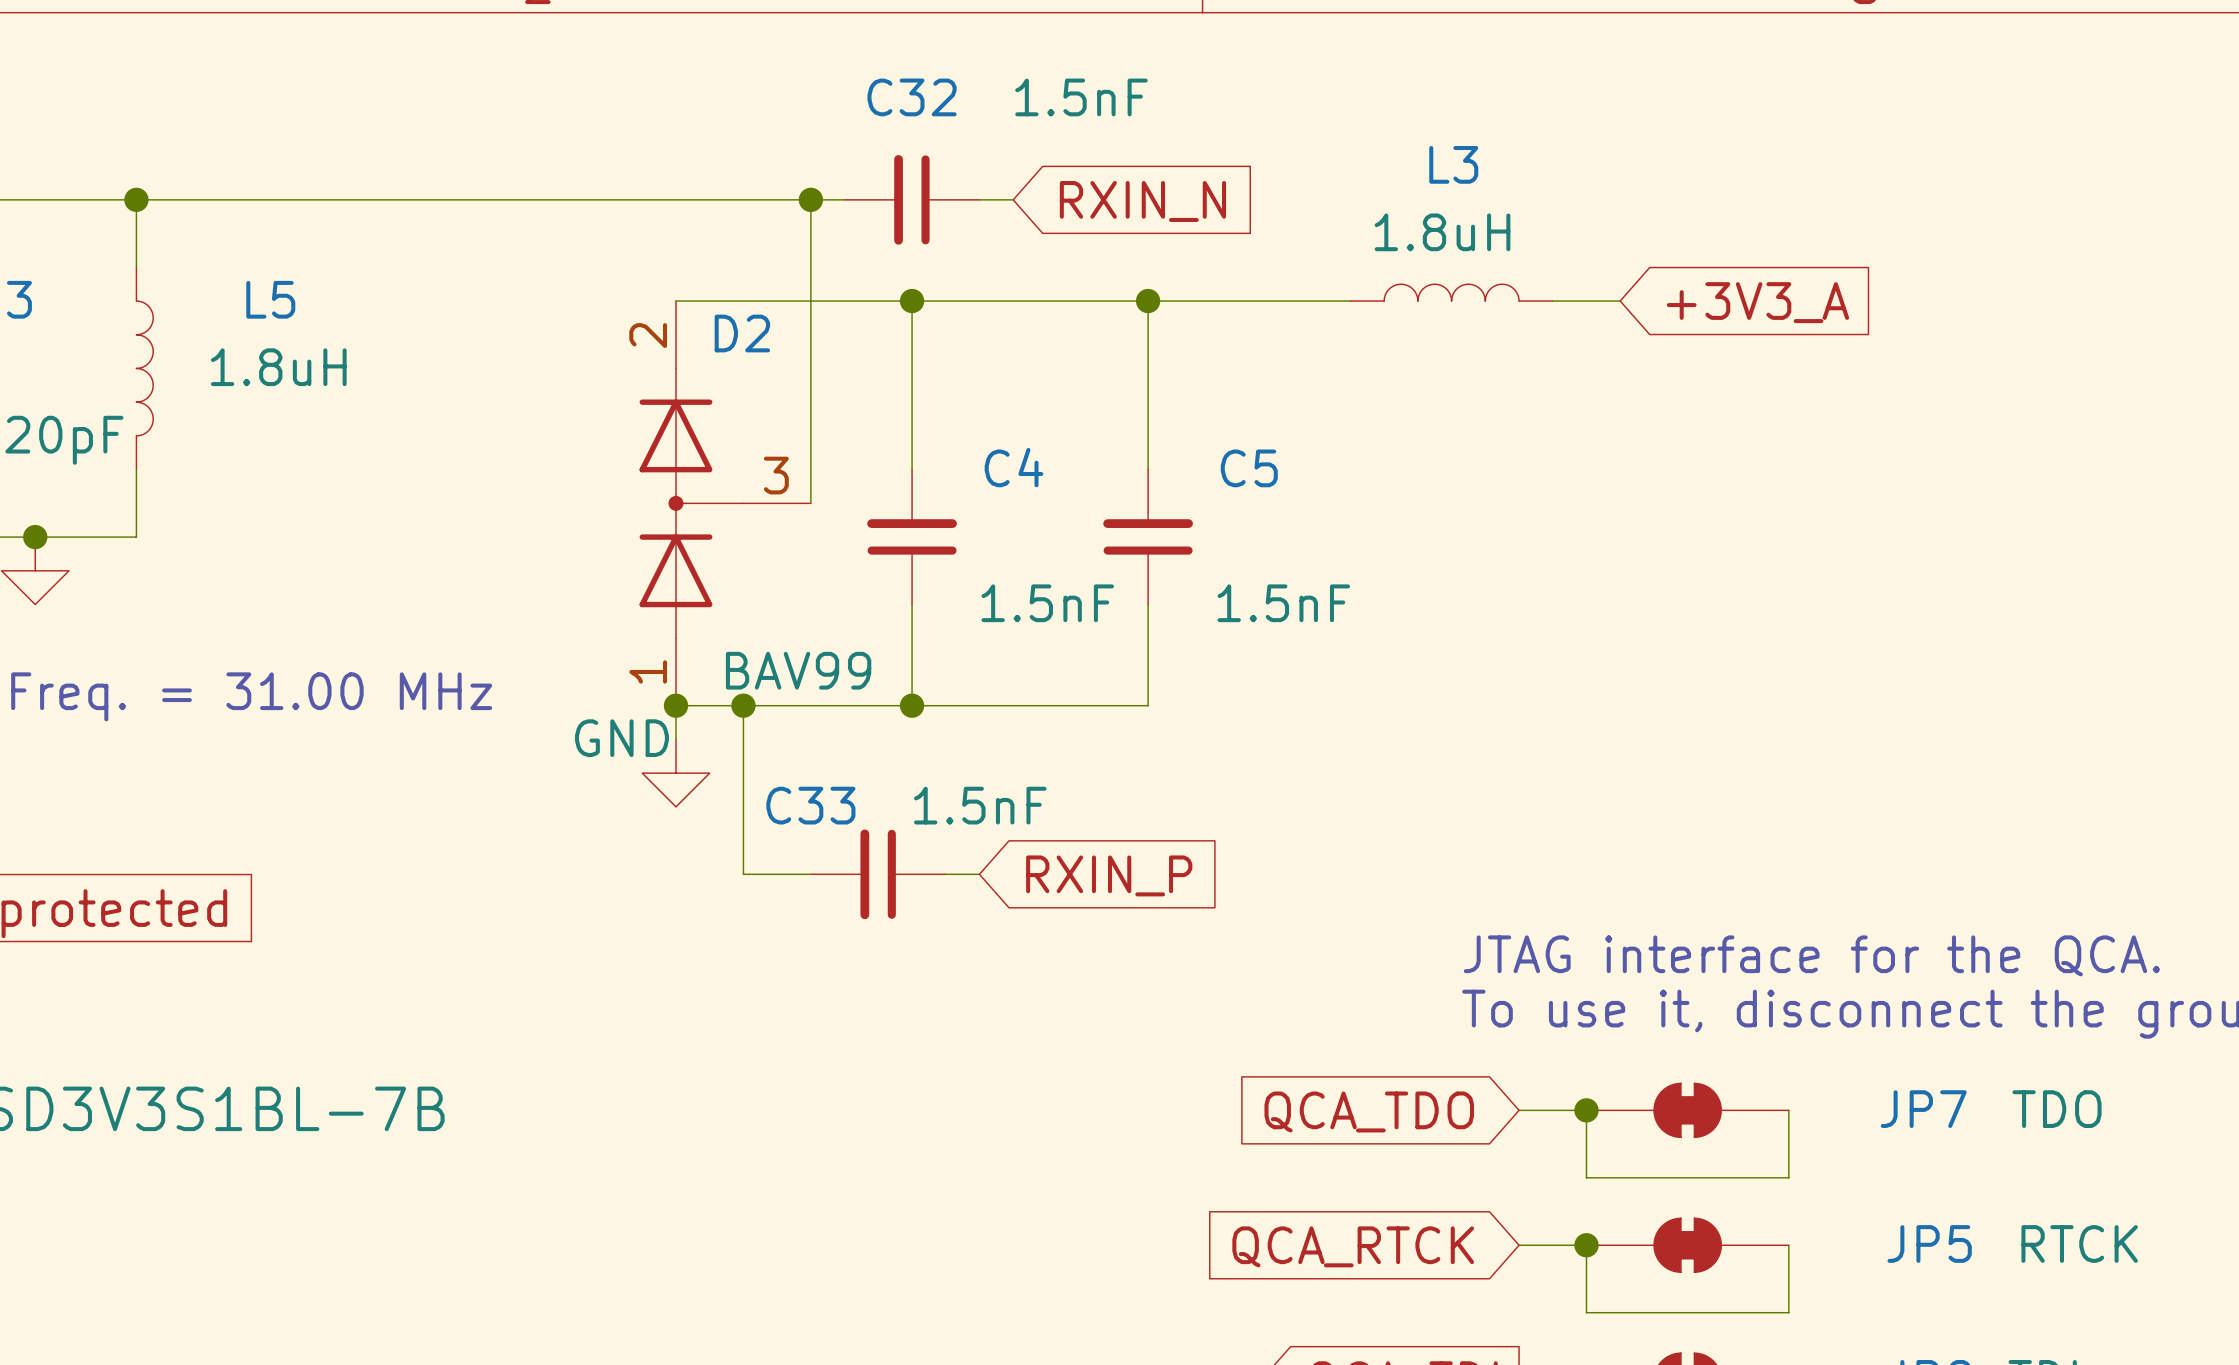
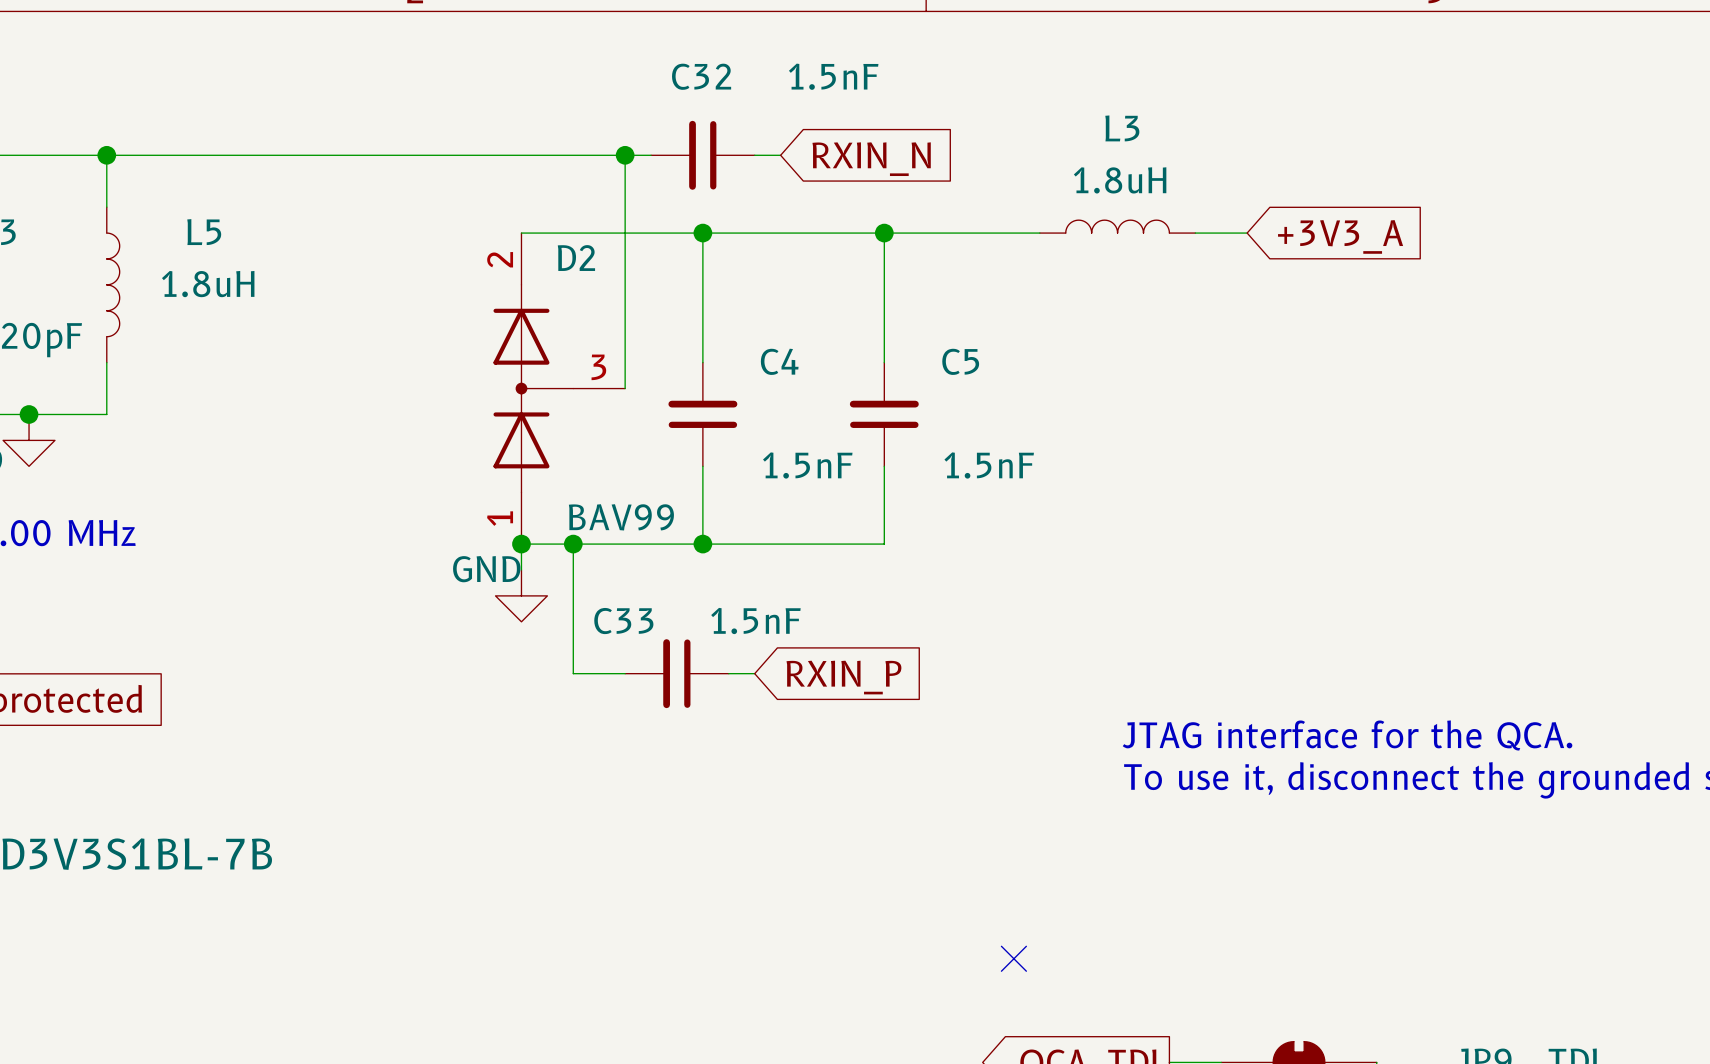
wire: (1519, 1110) (1586, 1110) (1586, 1177) (1788, 1177) (1788, 1110) -> none
junction: (1586, 1110) -> none
JP7: TDO (1687, 1110) -> none
global label: QCA_TDO (1369, 1111) -> none
no-connect mark: none -> (1013, 958)
wire: (1519, 1245) (1586, 1245) (1586, 1312) (1788, 1312) (1788, 1245) -> none
junction: (1586, 1245) -> none
JP5: RTCK (1687, 1245) -> none
global label: QCA_RTCK (1353, 1246) -> none

